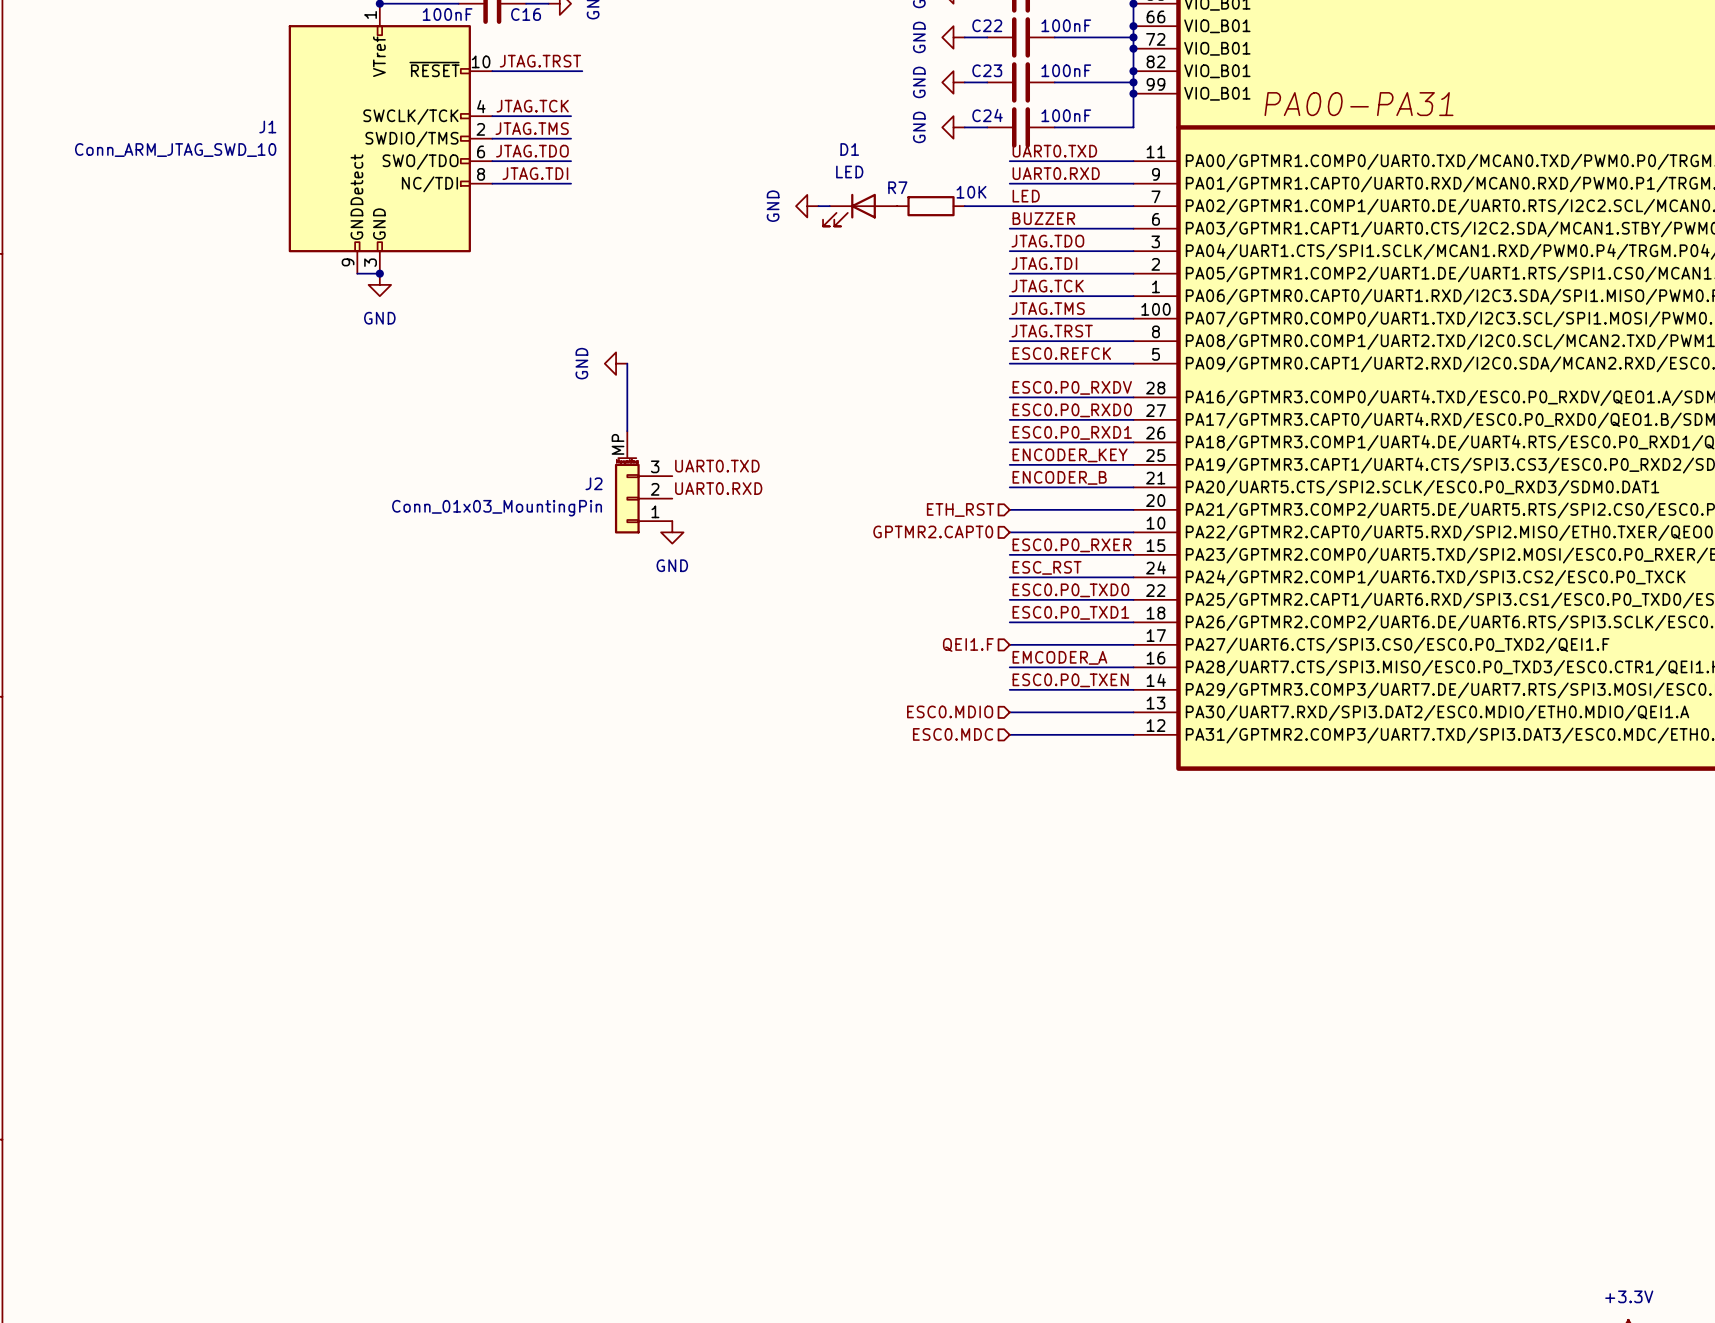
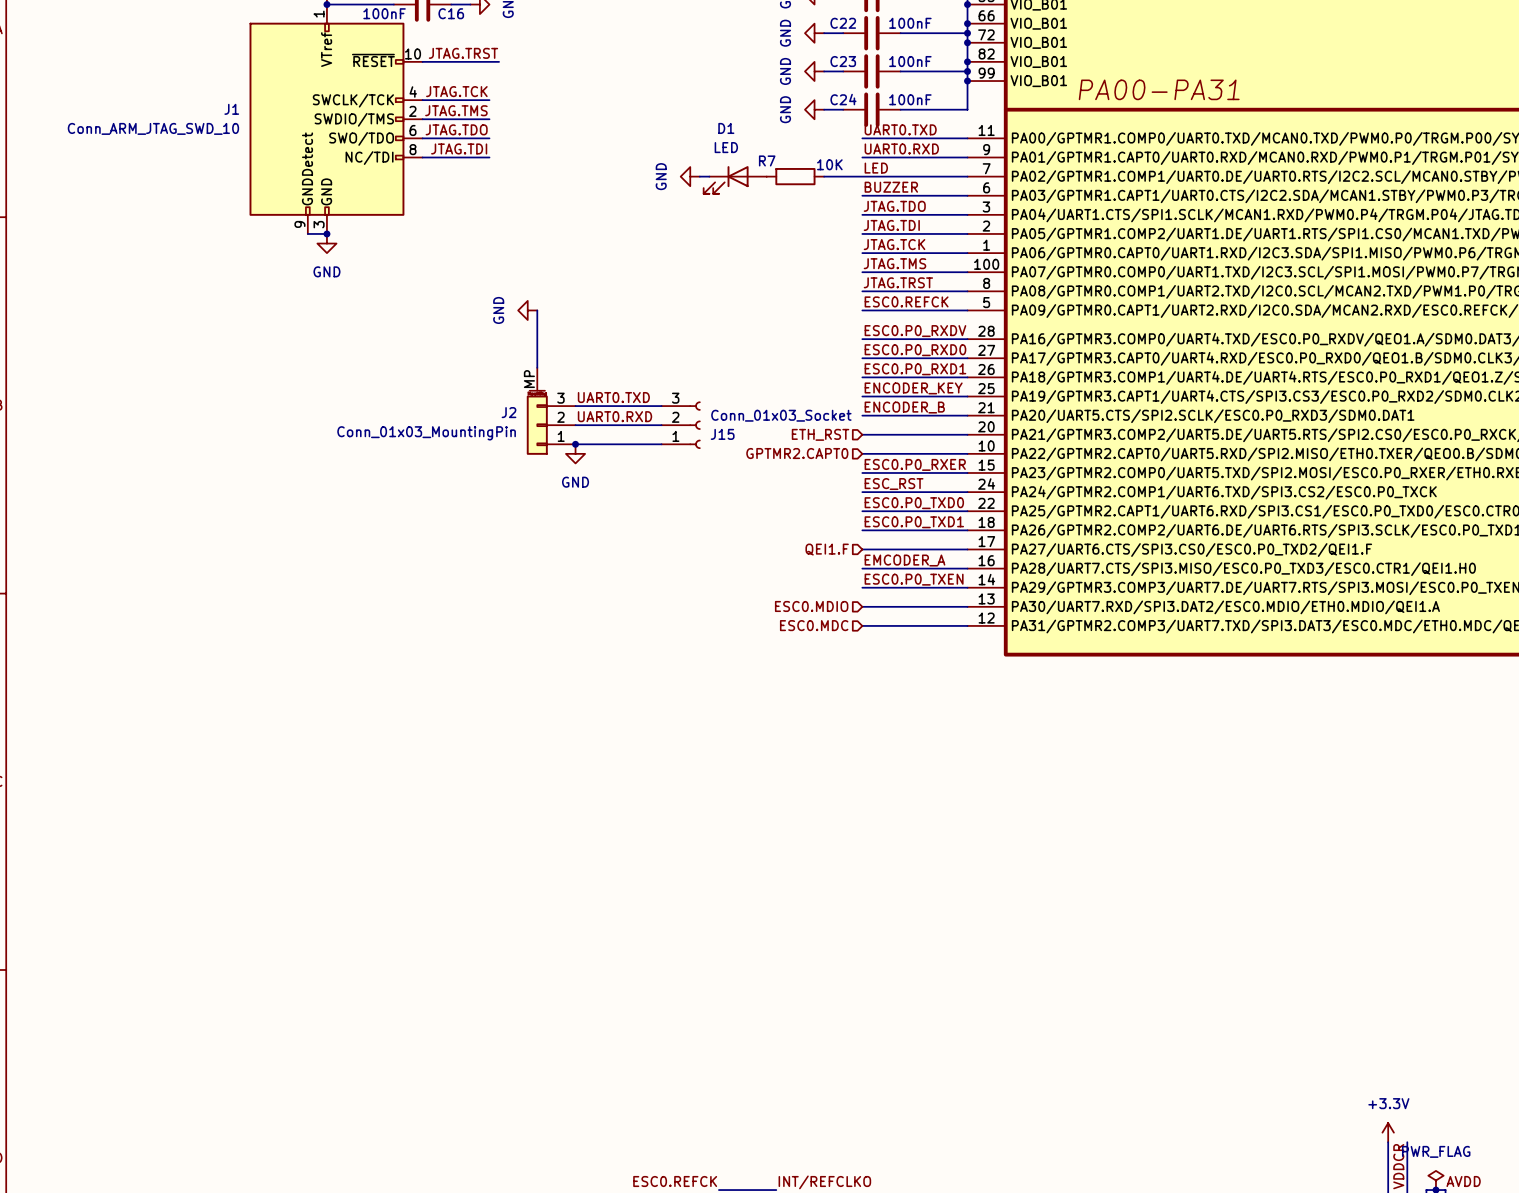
wire: none -> (575, 406) (661, 406)
wire: none -> (575, 425) (661, 425)
J15: none -> Conn_01x03_Socket (680, 425)
wire: none -> (575, 444) (661, 444)
junction: none -> (575, 444)

